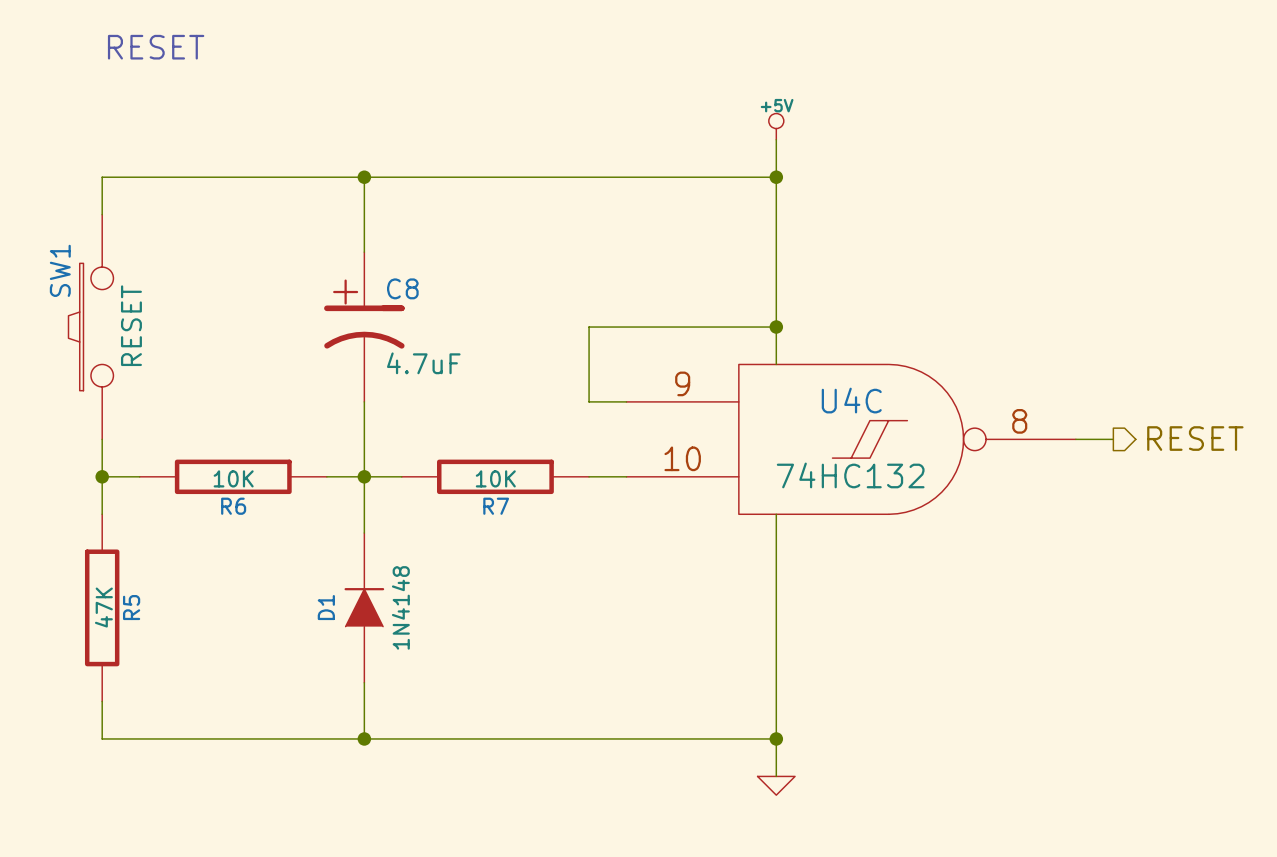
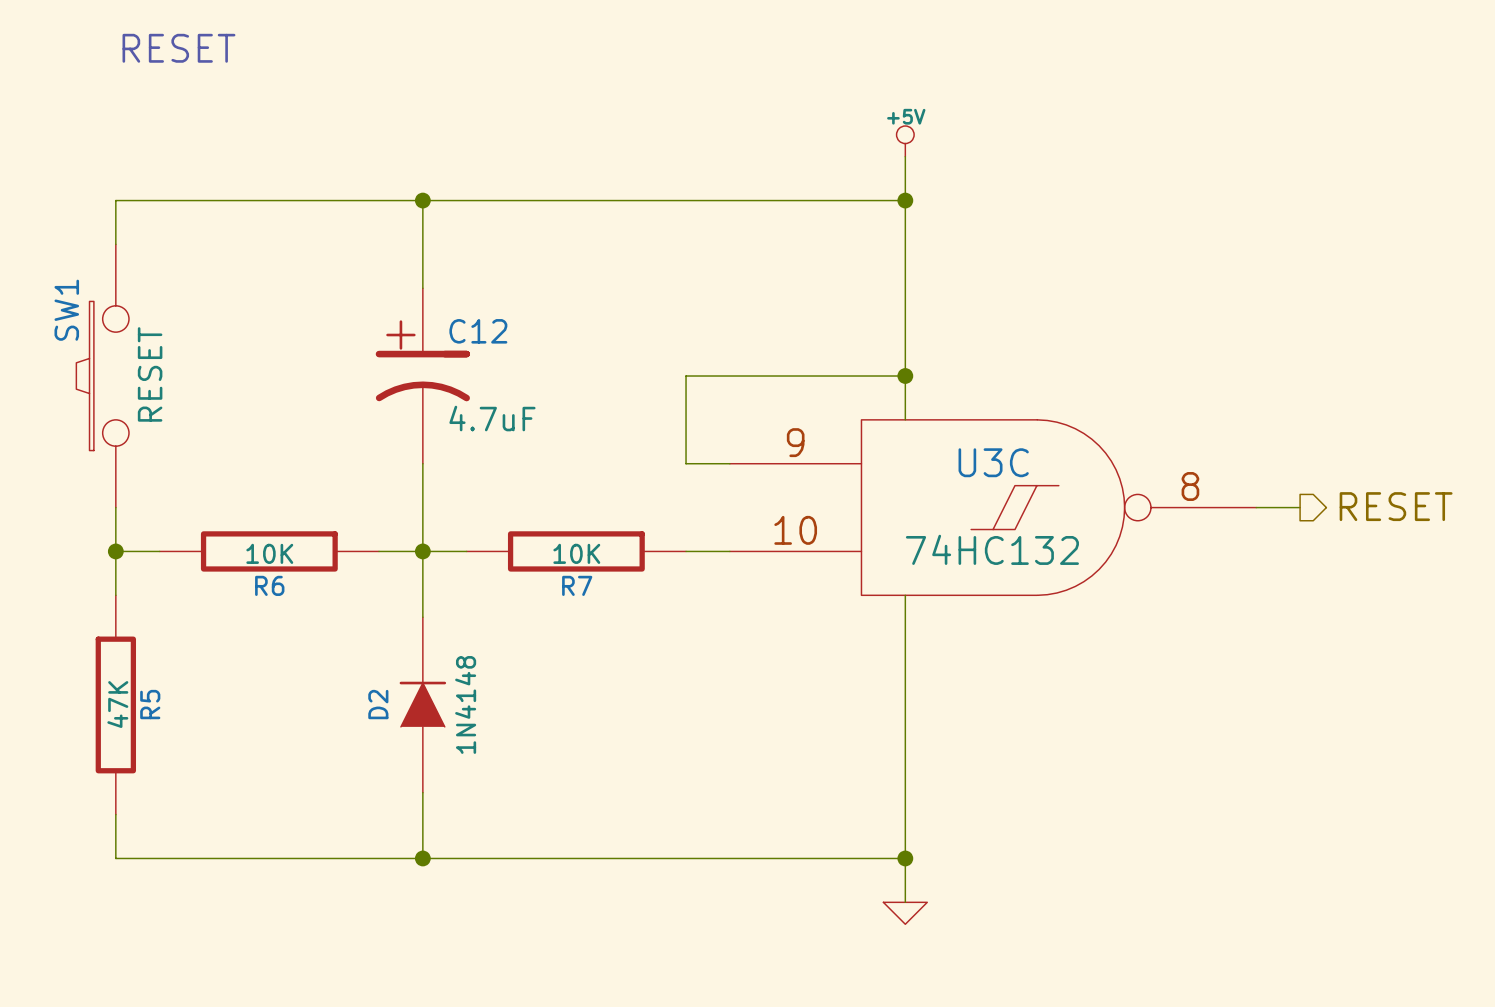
C8 name: C8 (402, 288) -> C12 (478, 331)
U4C name: U4C (851, 400) -> U3C (993, 462)
D1 name: D1 (326, 607) -> D2 (378, 704)

